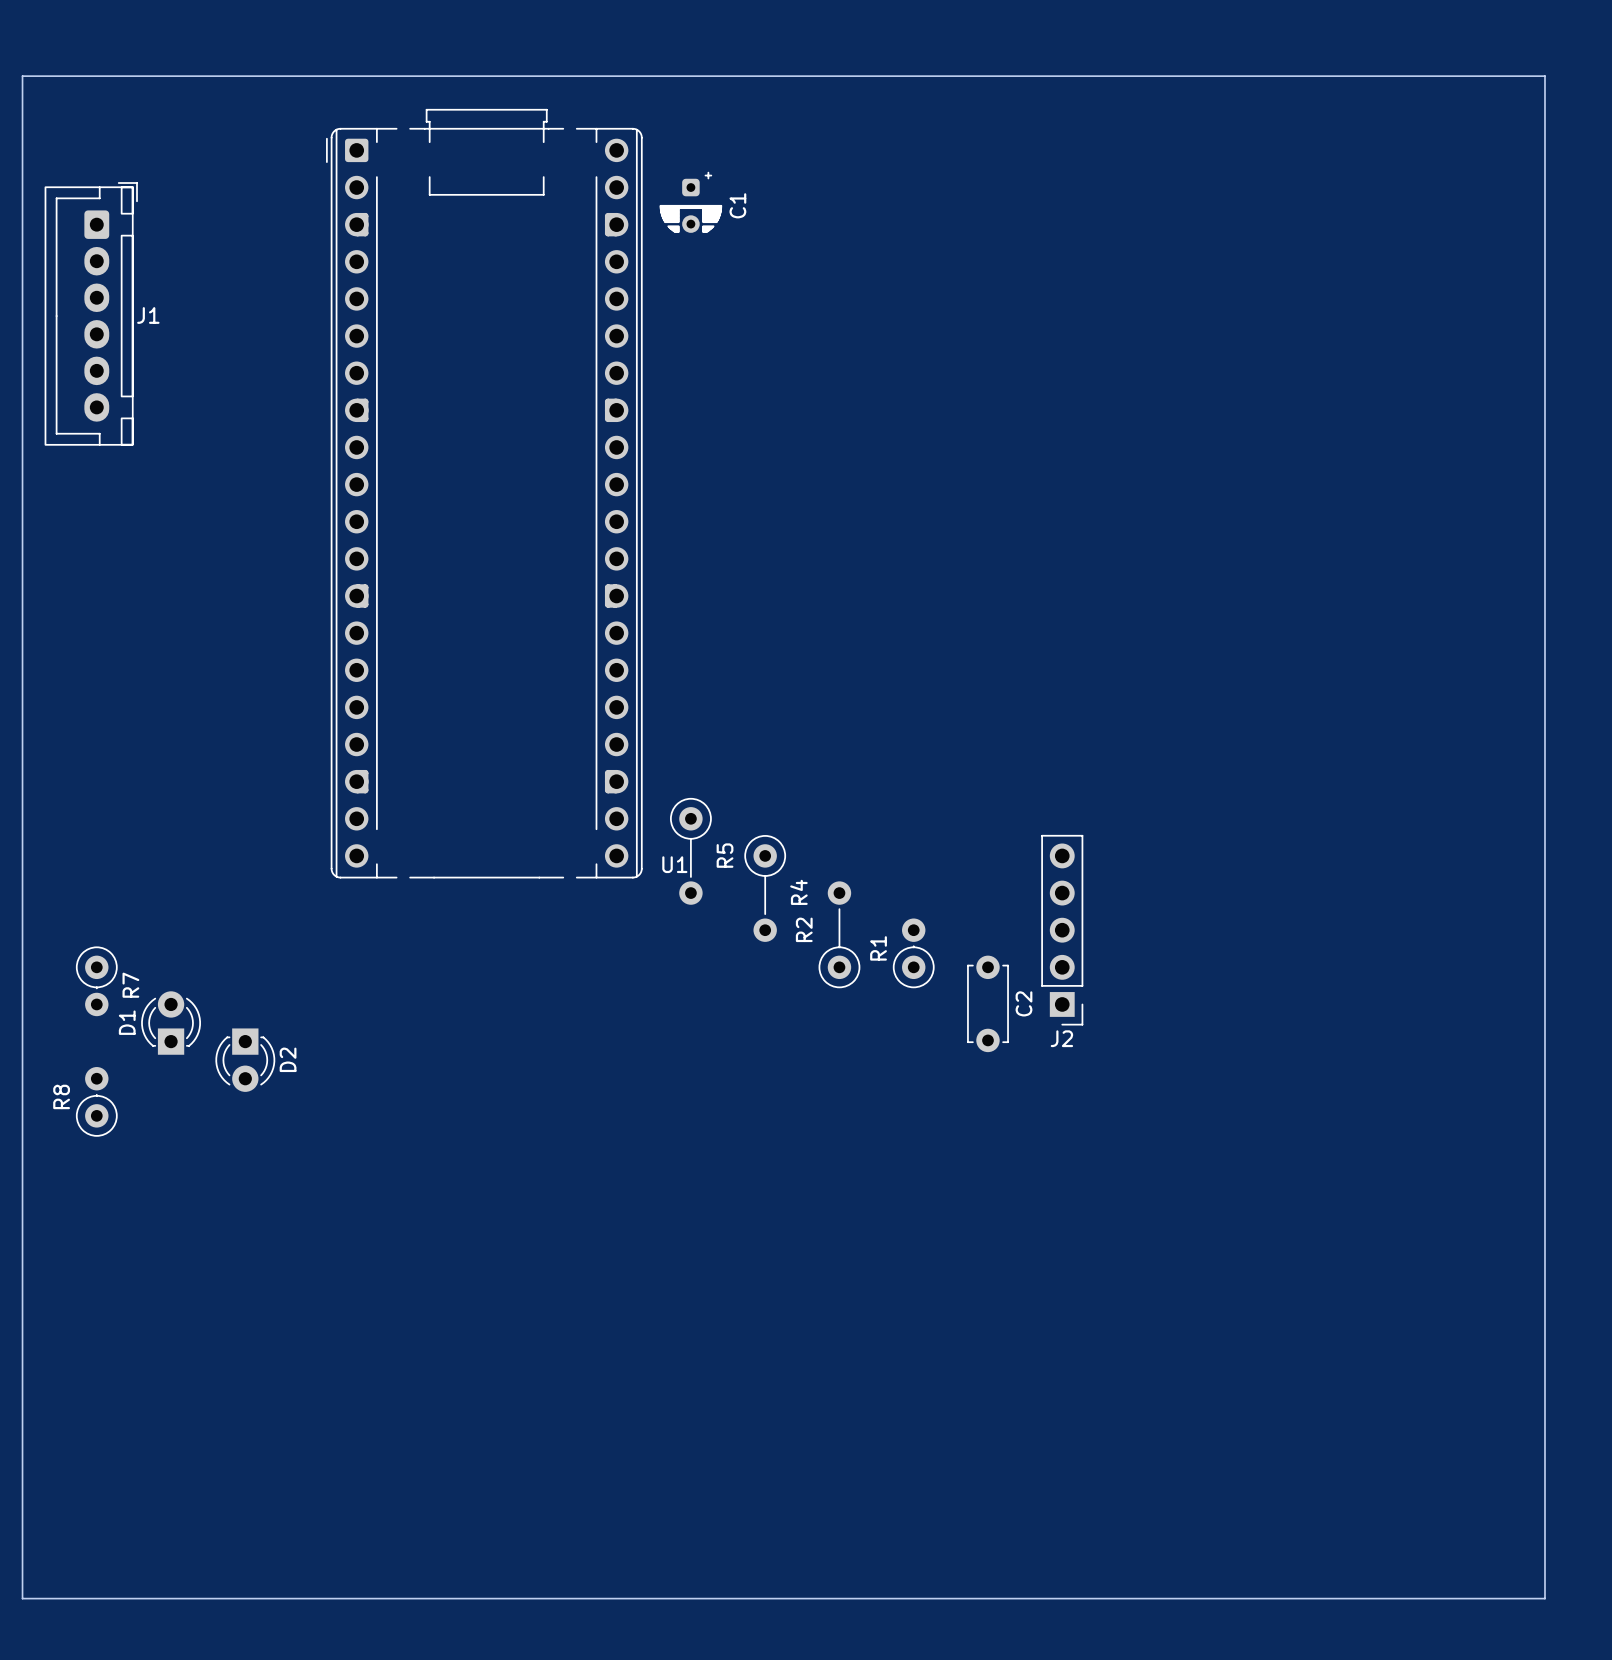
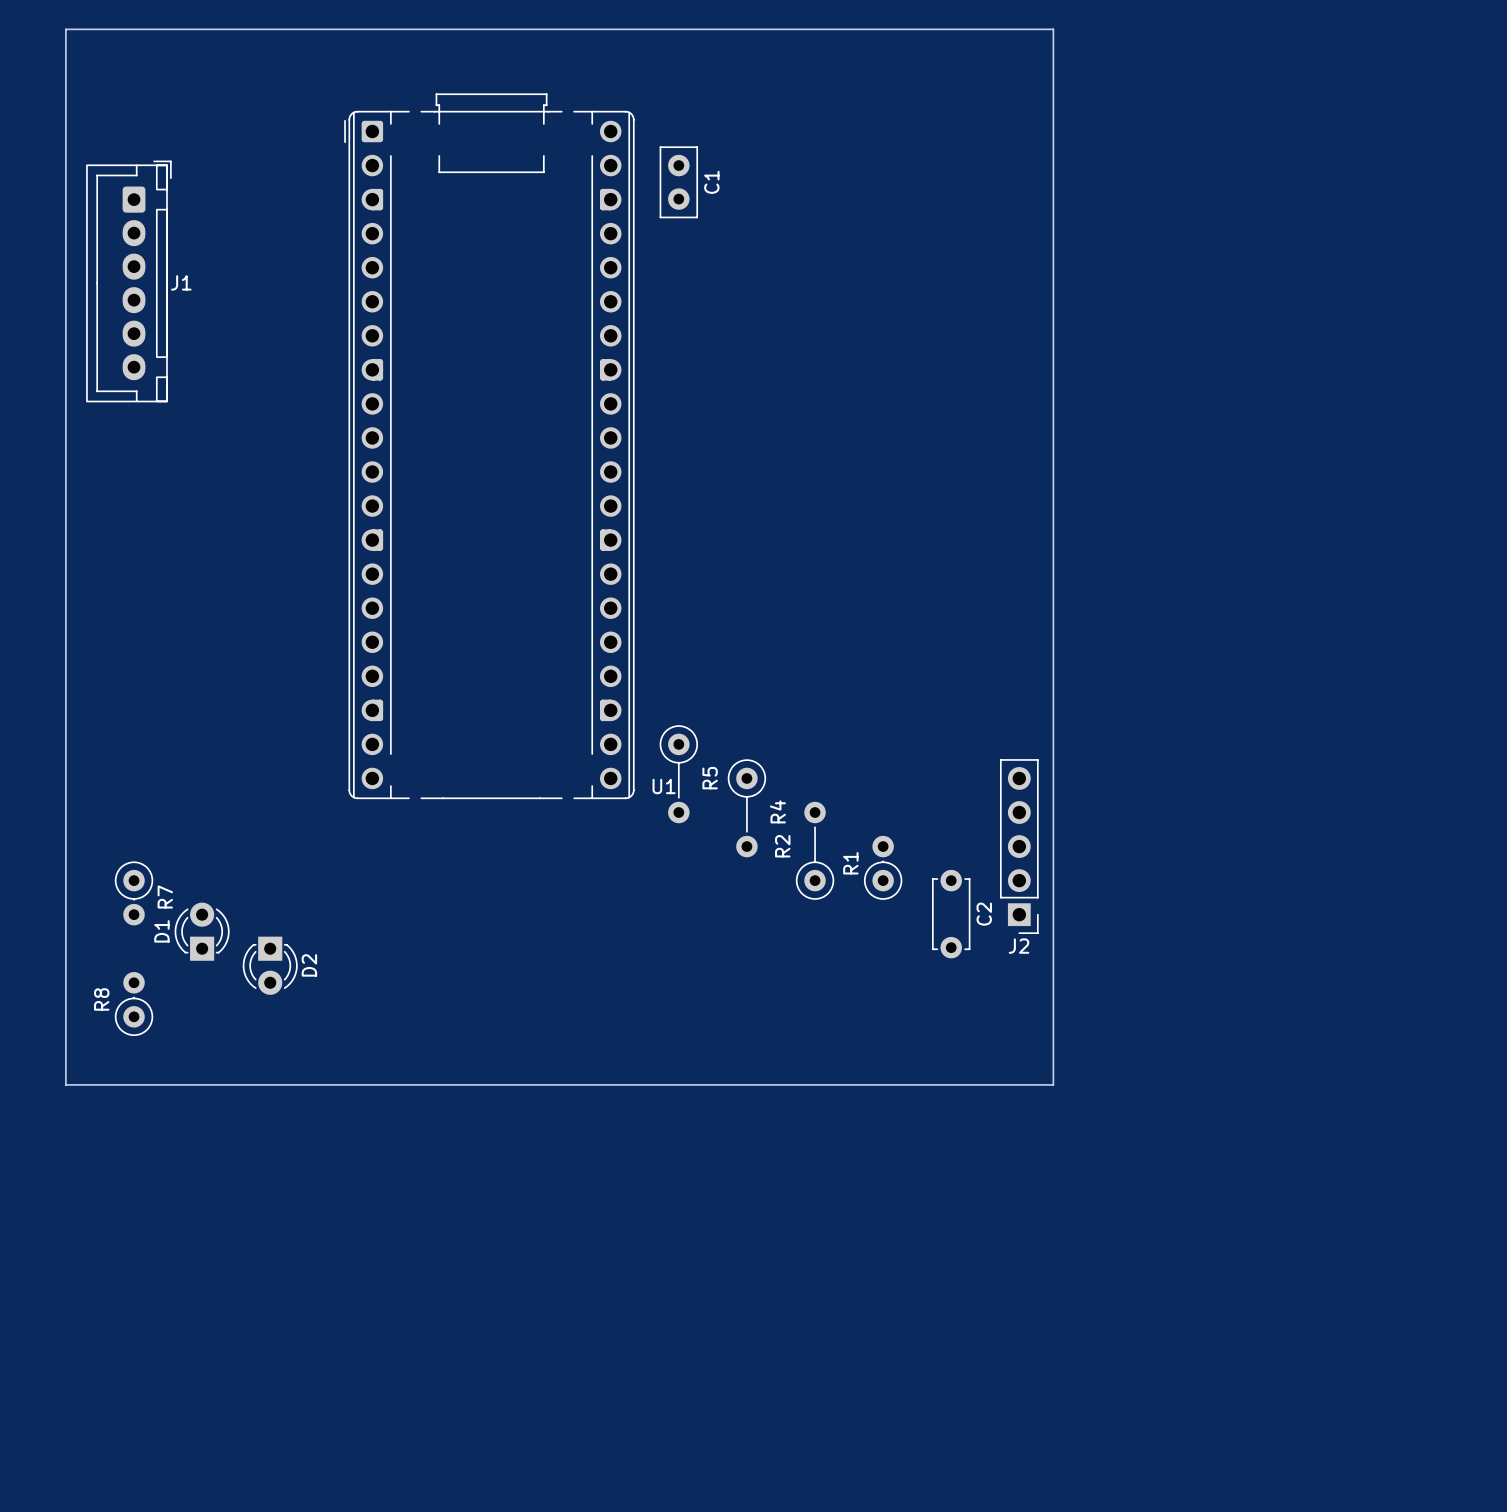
board edge: (22, 76) (1544, 76) (1544, 1598) (22, 1598) (22, 1190) -> (65, 63) (65, 29) (1053, 29) (1053, 1084) (65, 1084)
C1 footprint: [659, 171, 723, 234] -> [659, 146, 698, 219]

